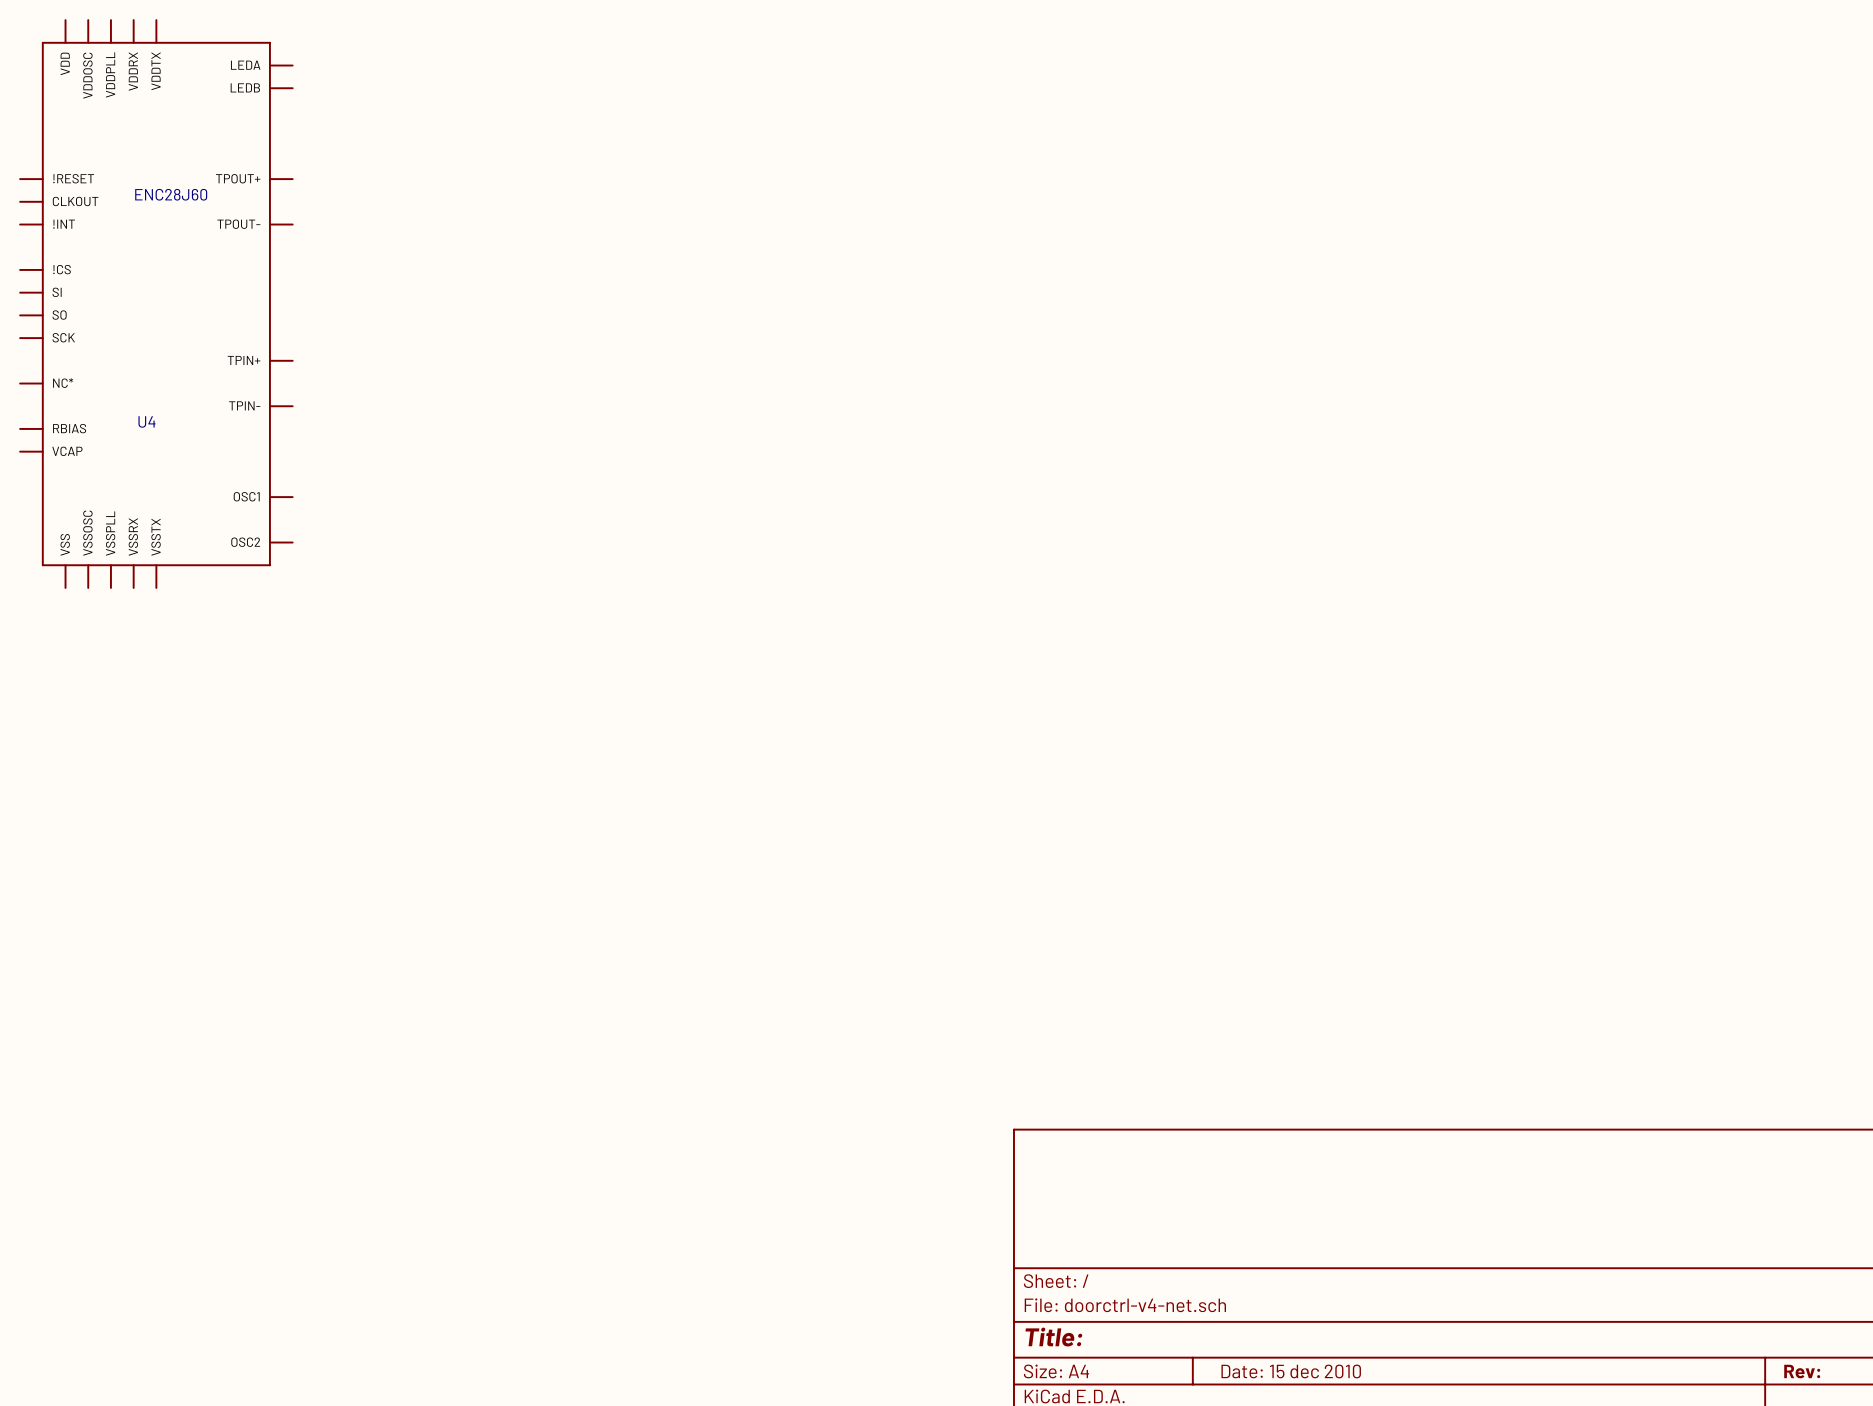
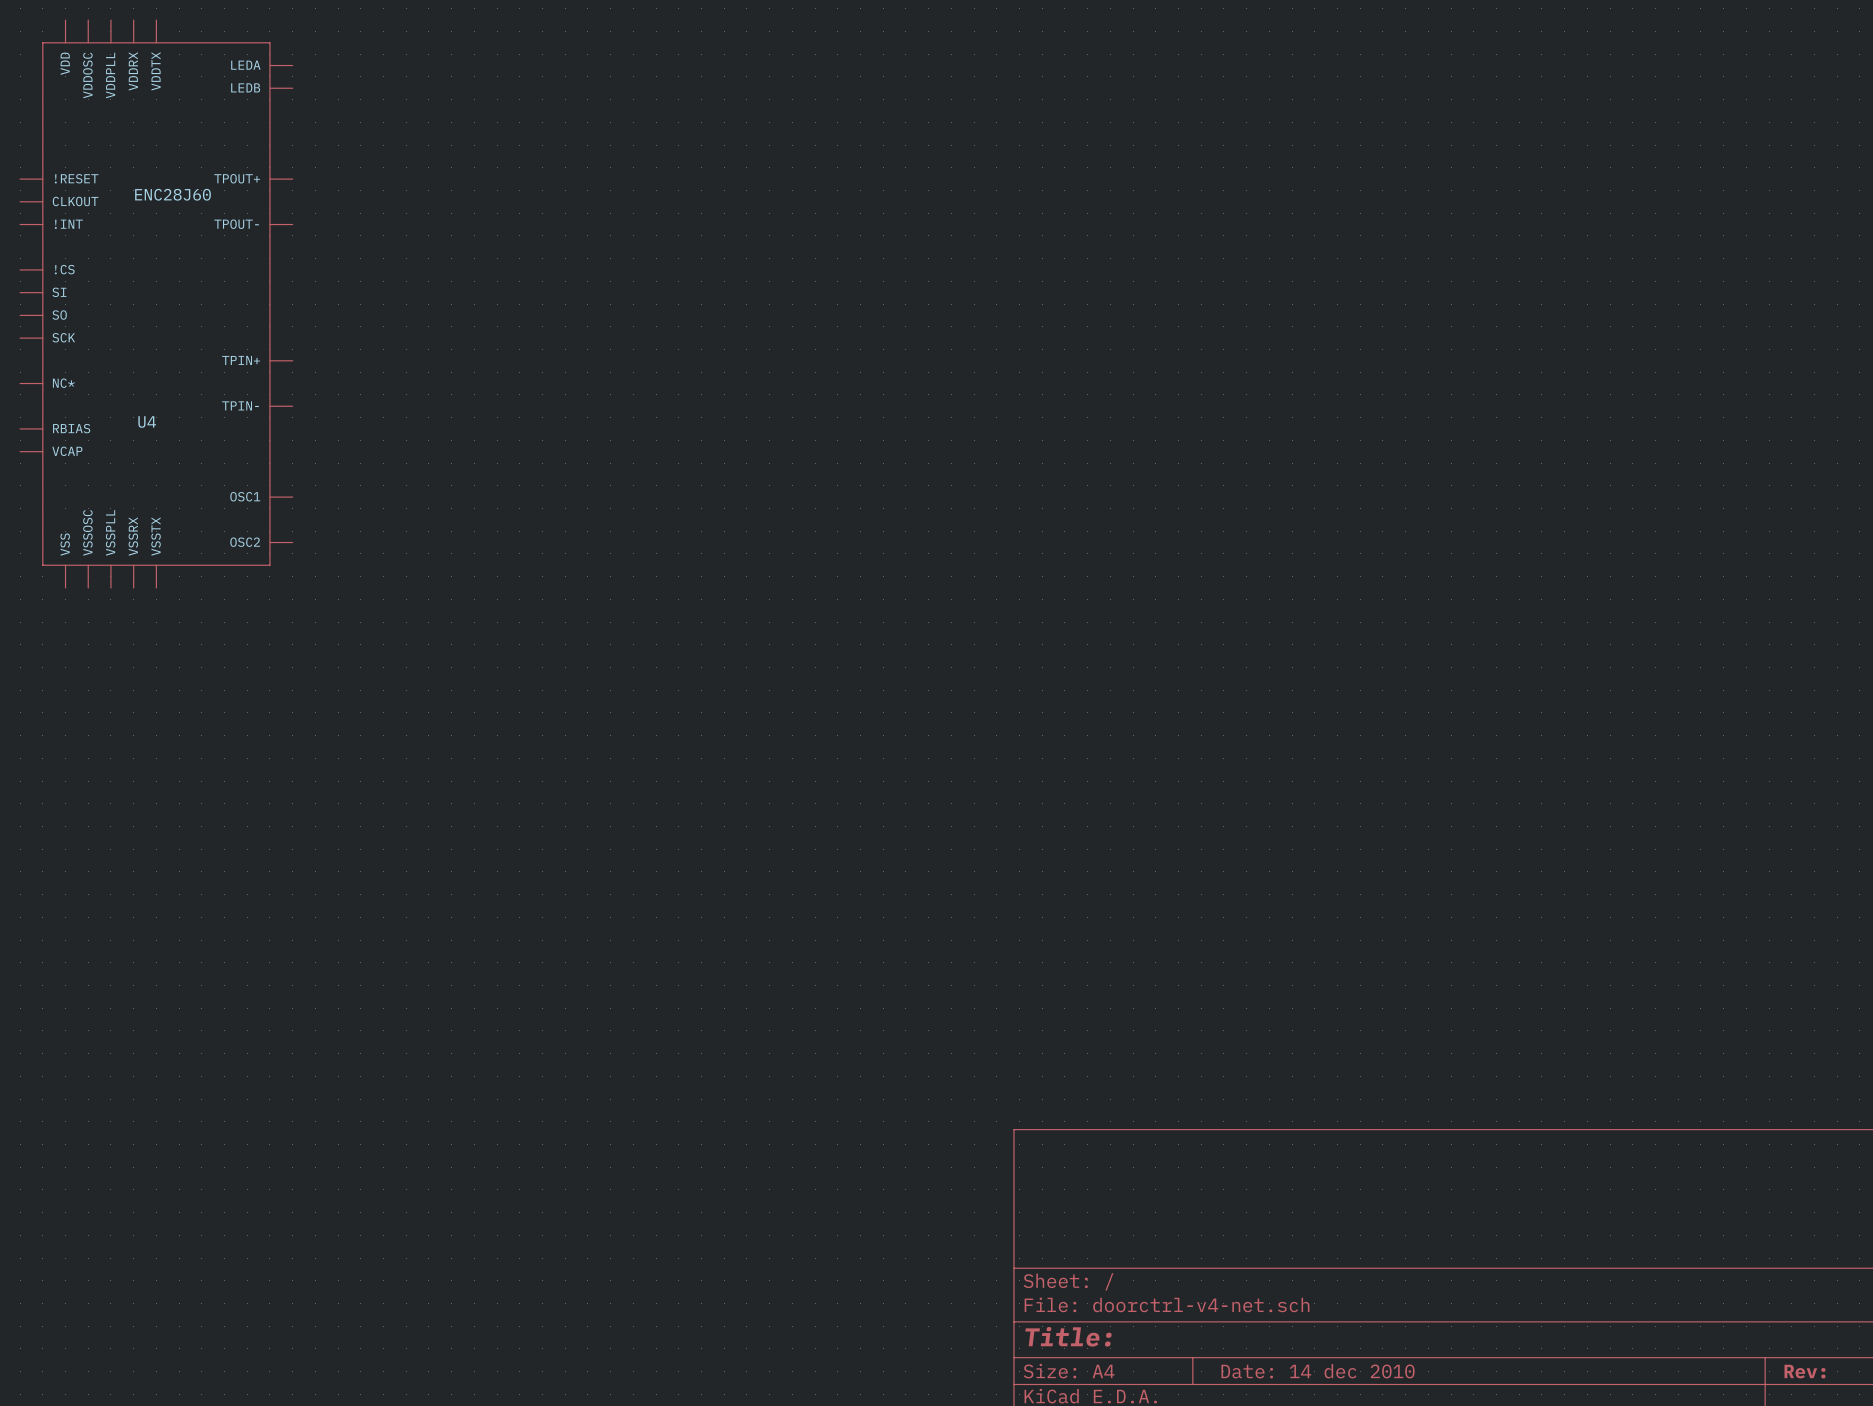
title block: Date: 15 dec 2010 (1291, 1371) -> Date: 14 dec 2010 (1318, 1371)

